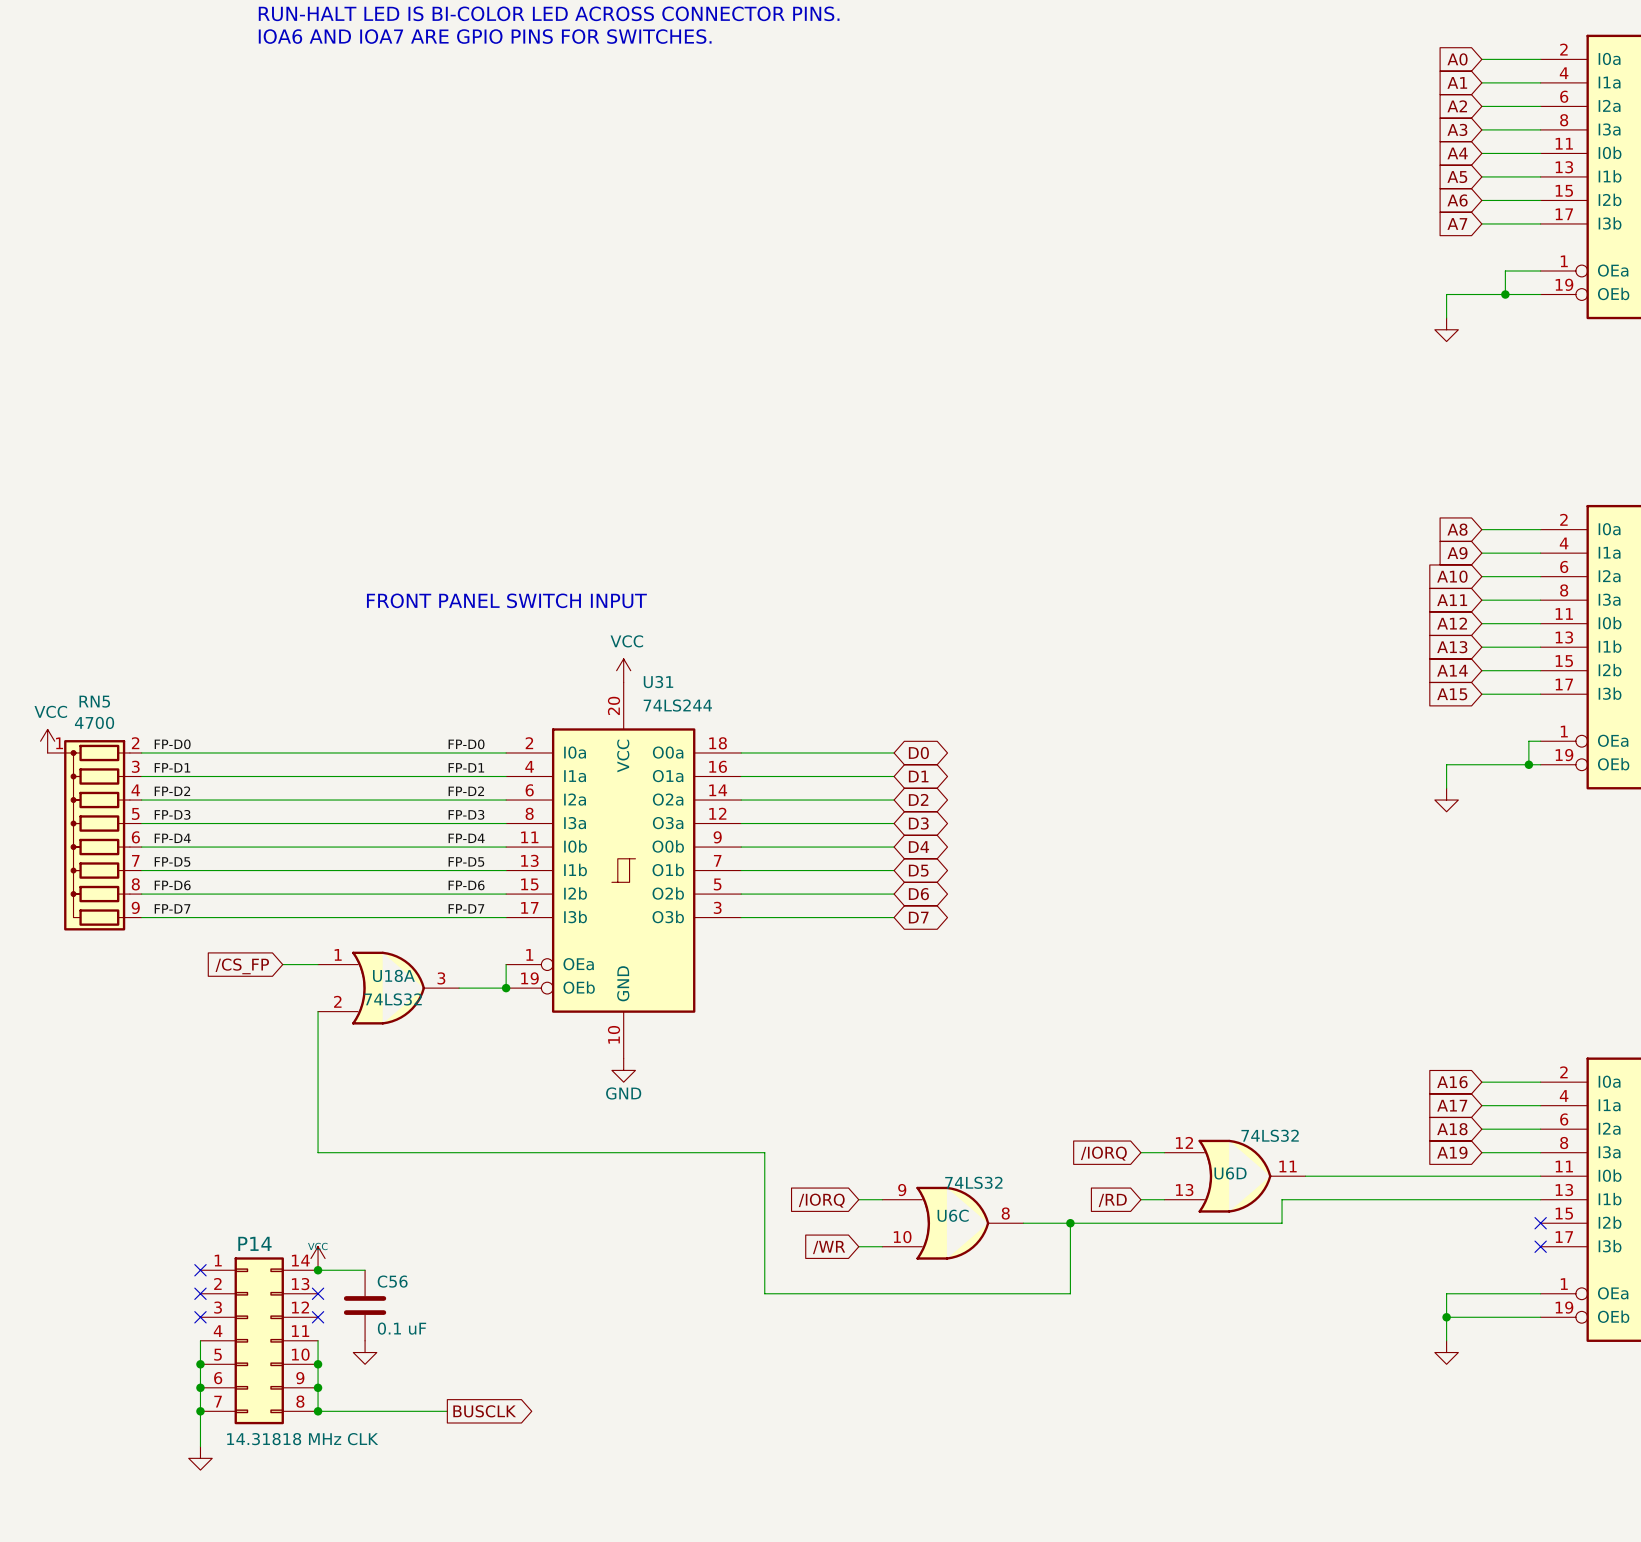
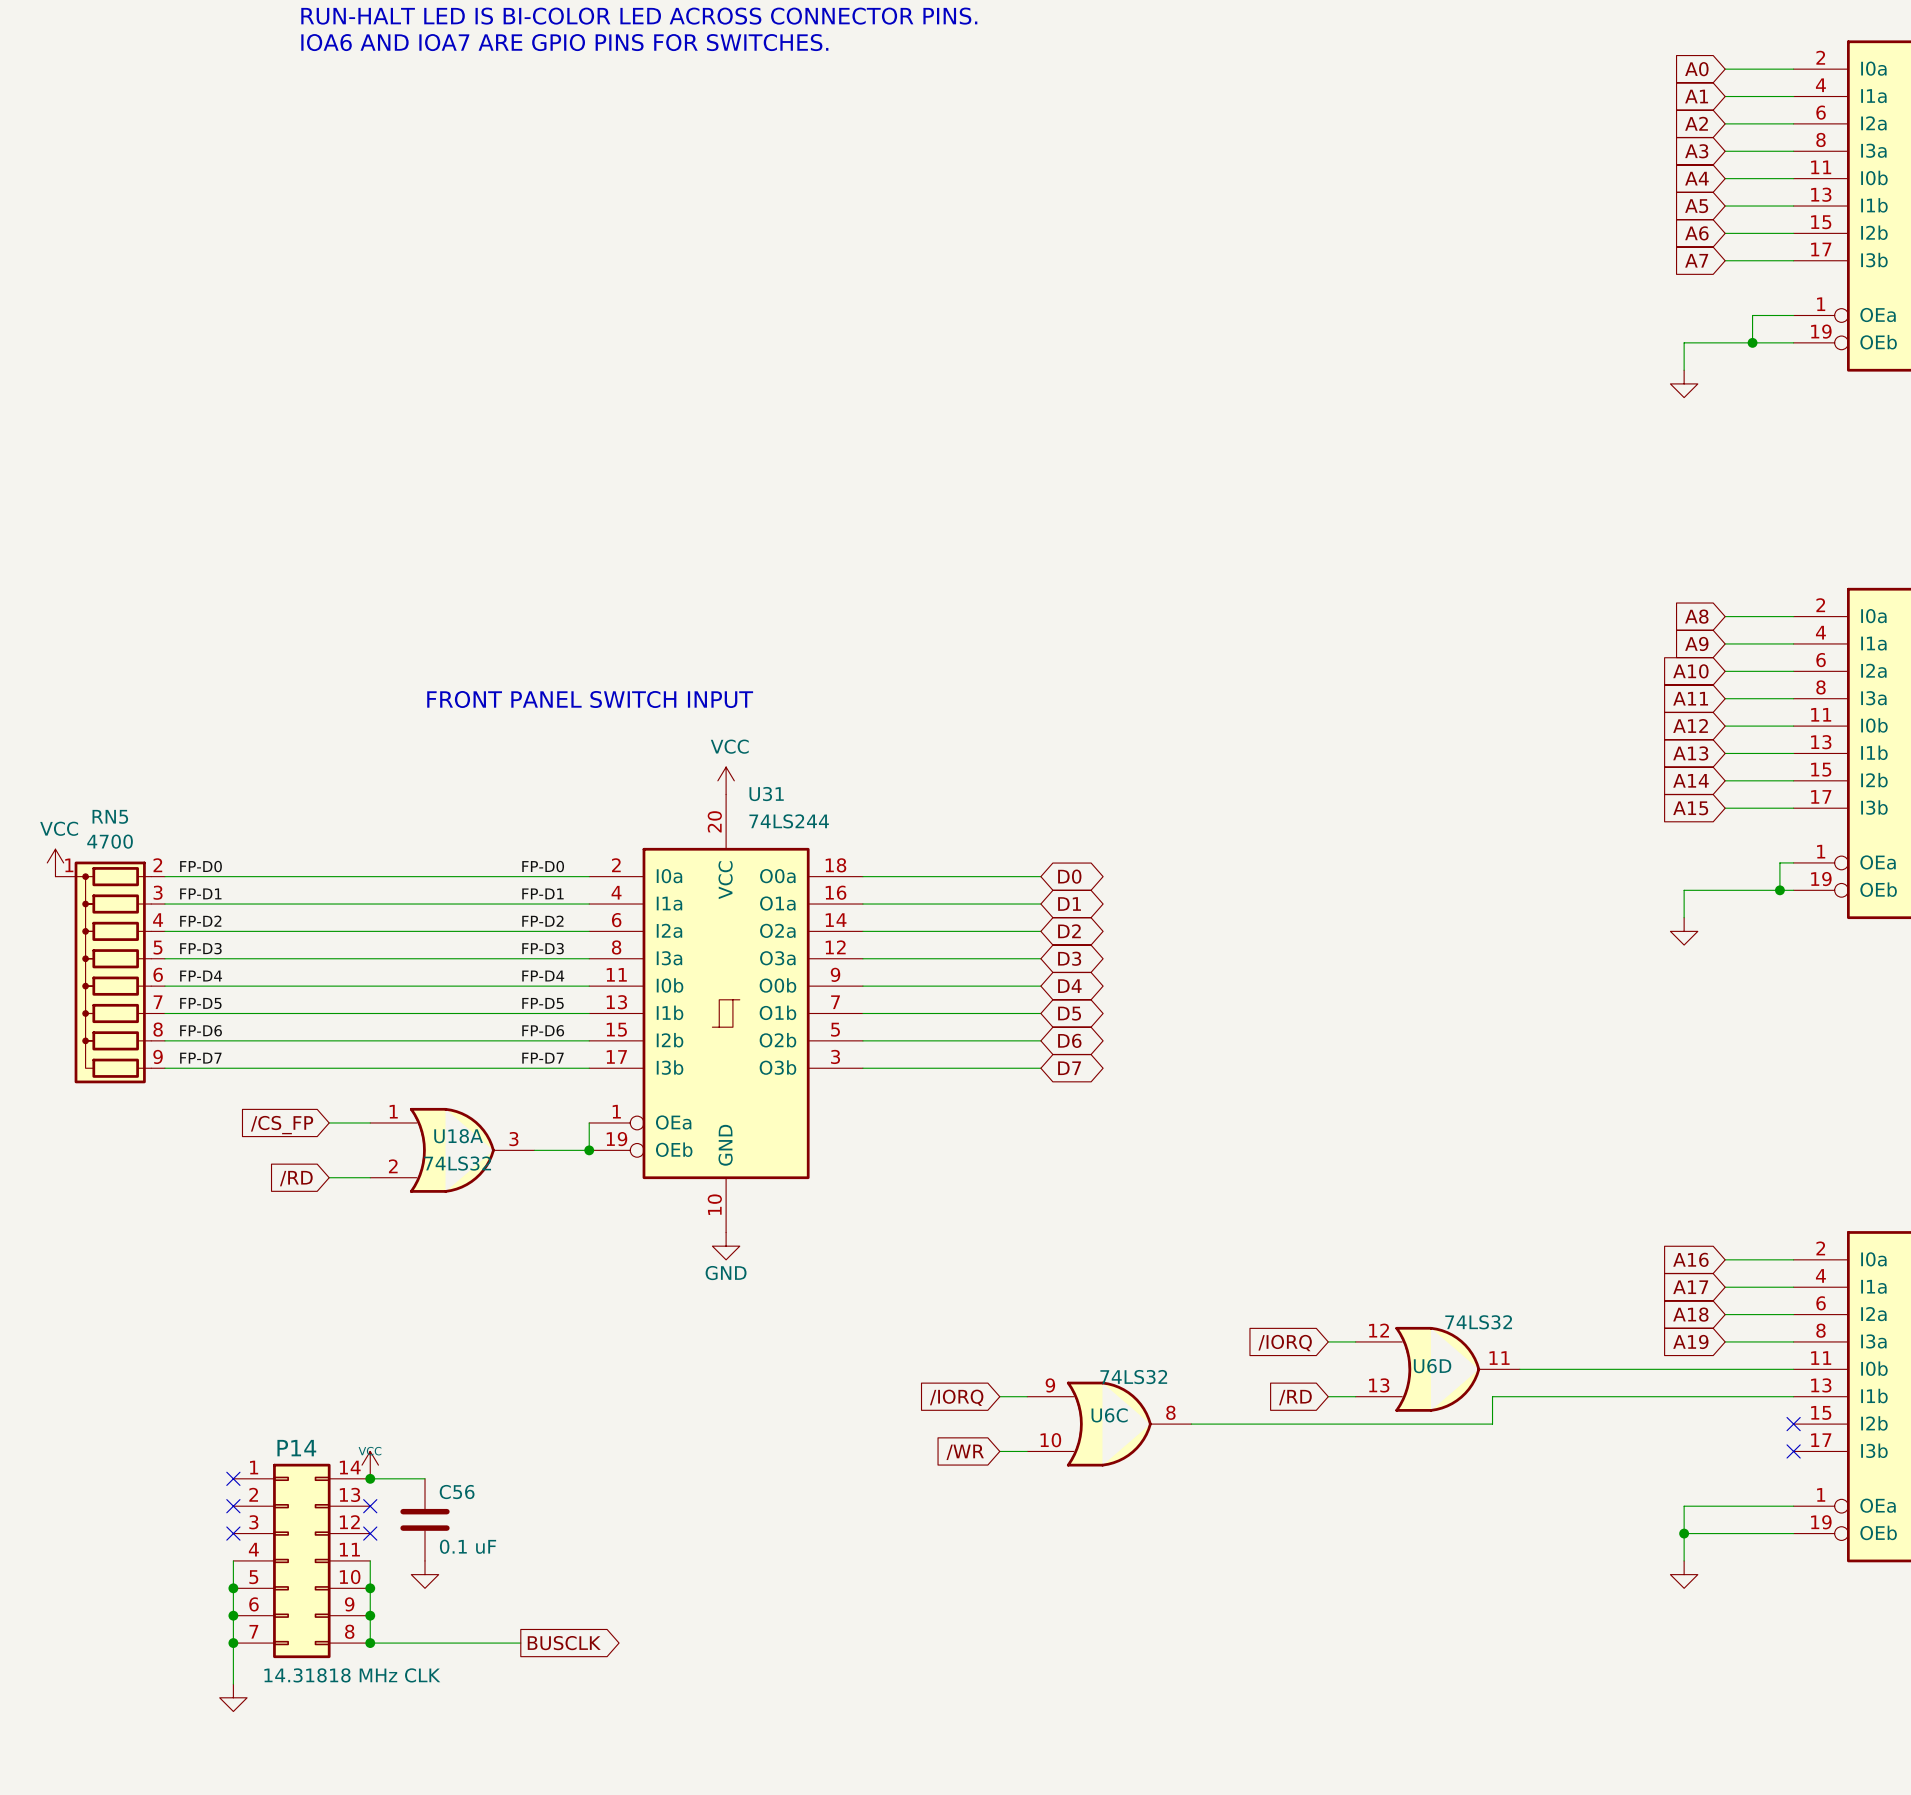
wire: (318, 1011) (318, 1152) (764, 1152) (764, 1293) (1070, 1293) (1070, 1223) -> (370, 1177) (329, 1177)
global label: none -> /RD (296, 1178)
junction: (1070, 1223) -> none

